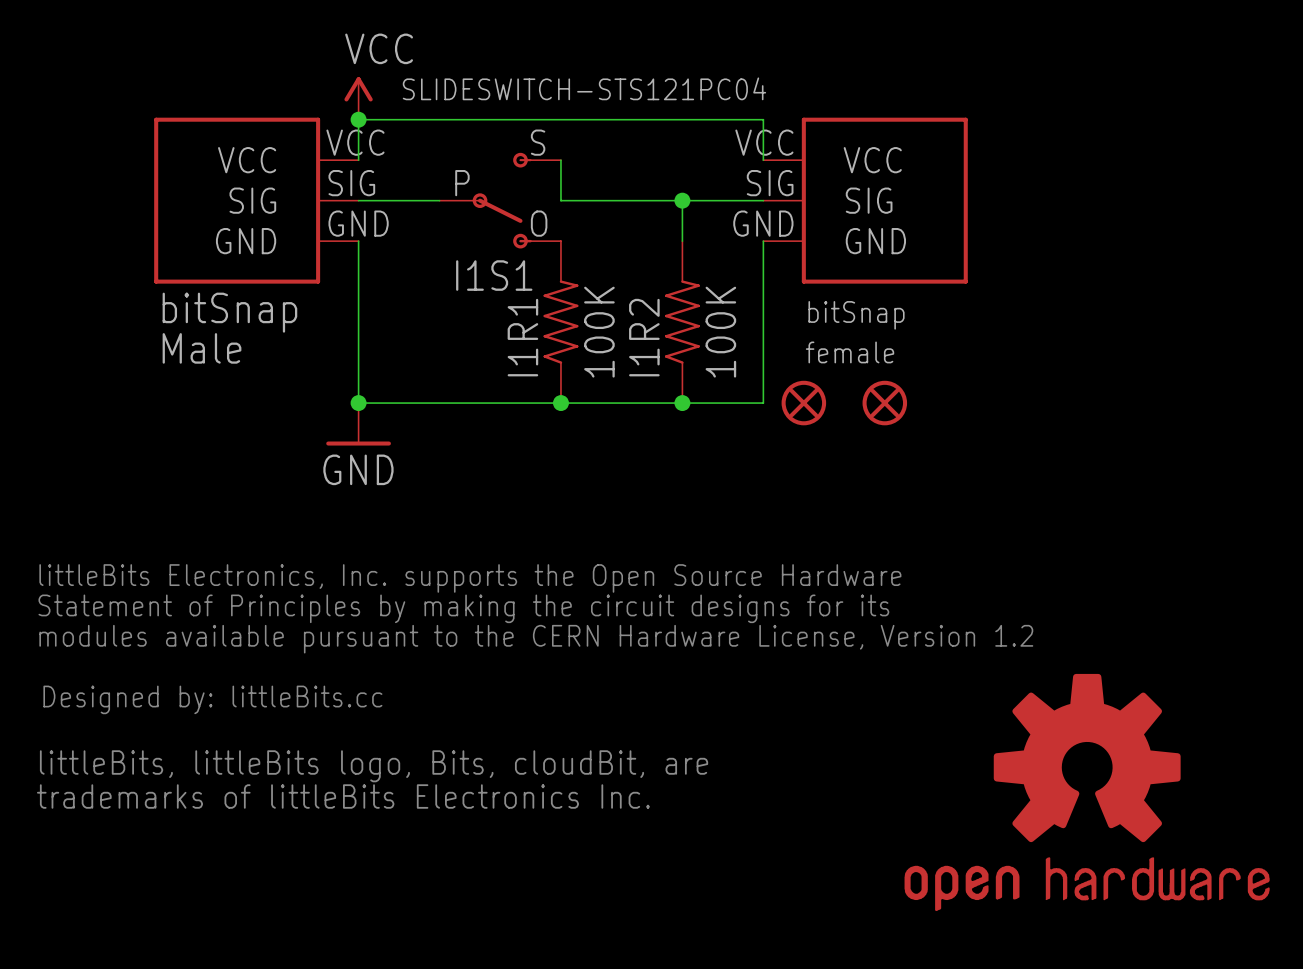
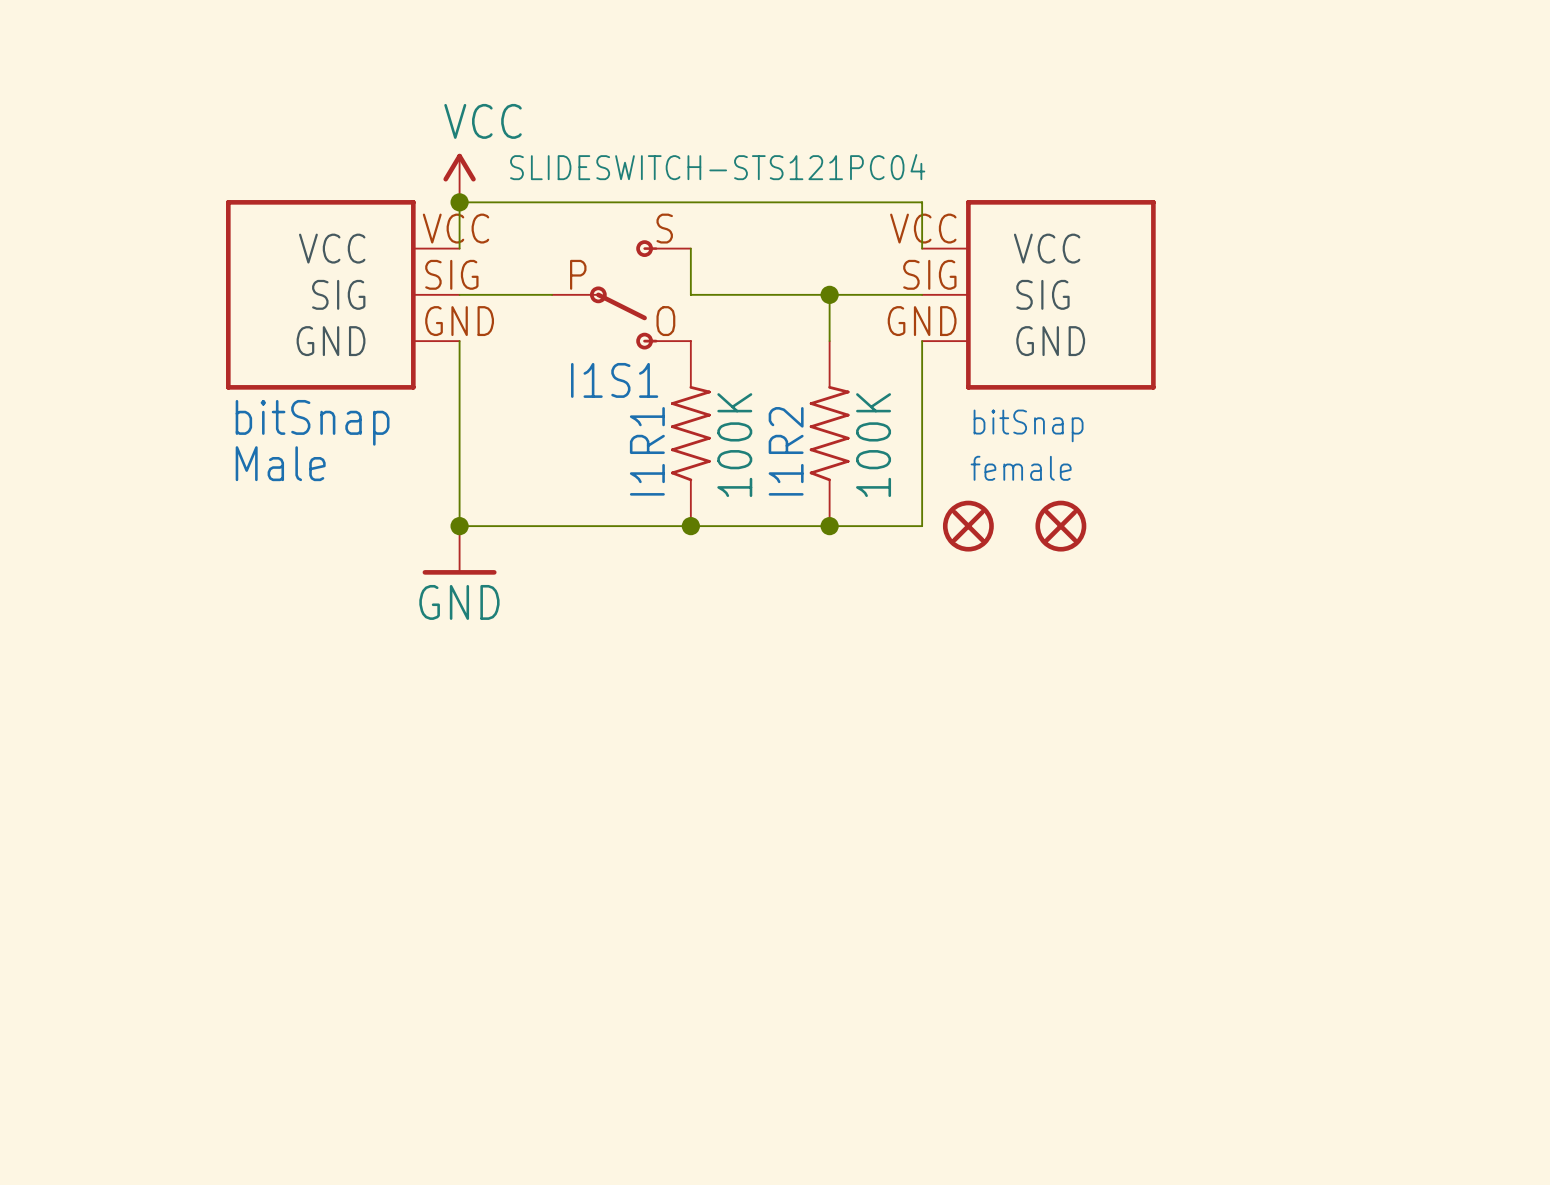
part: (535, 686) -> none
part: (1087, 792) -> none

